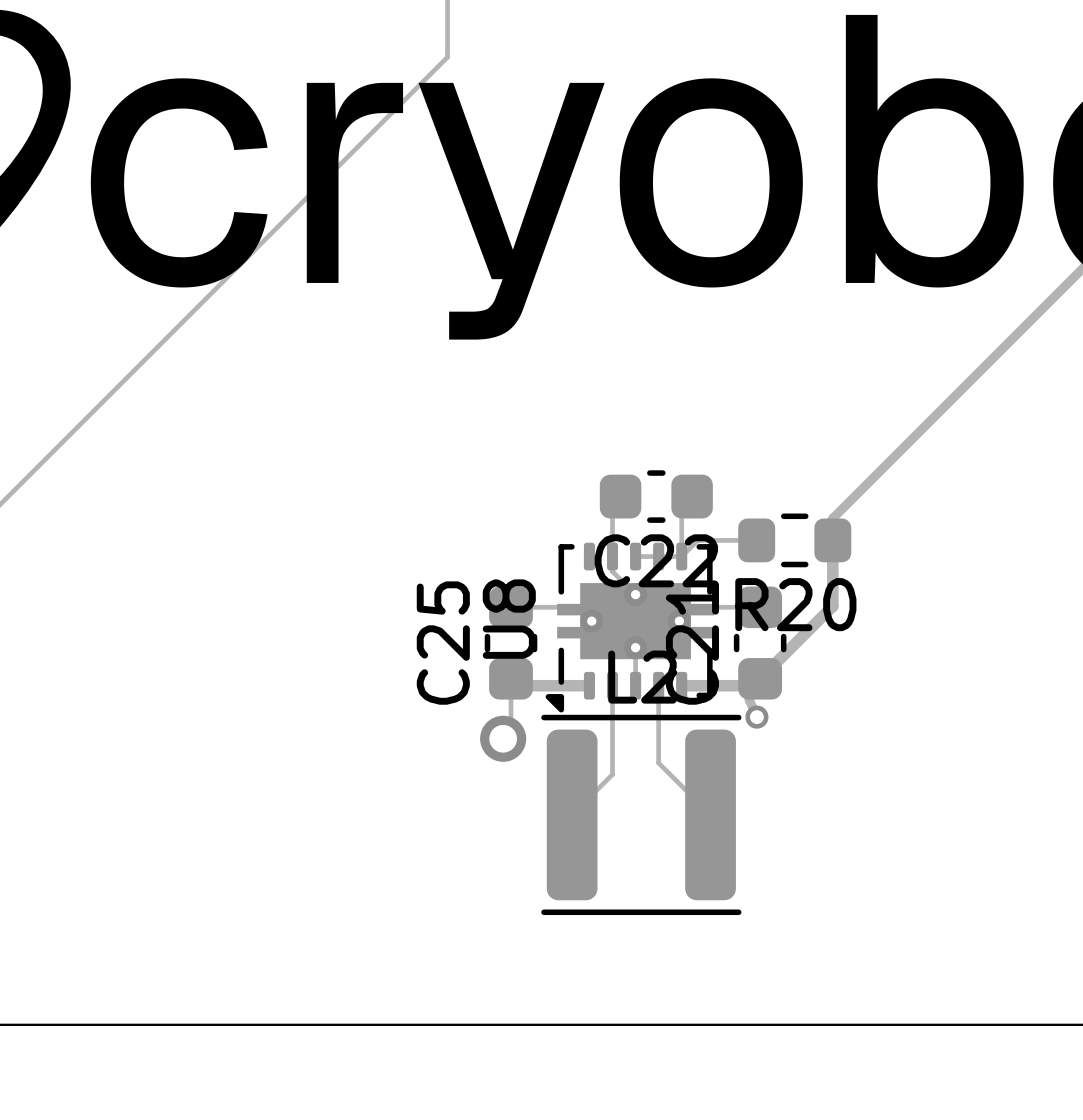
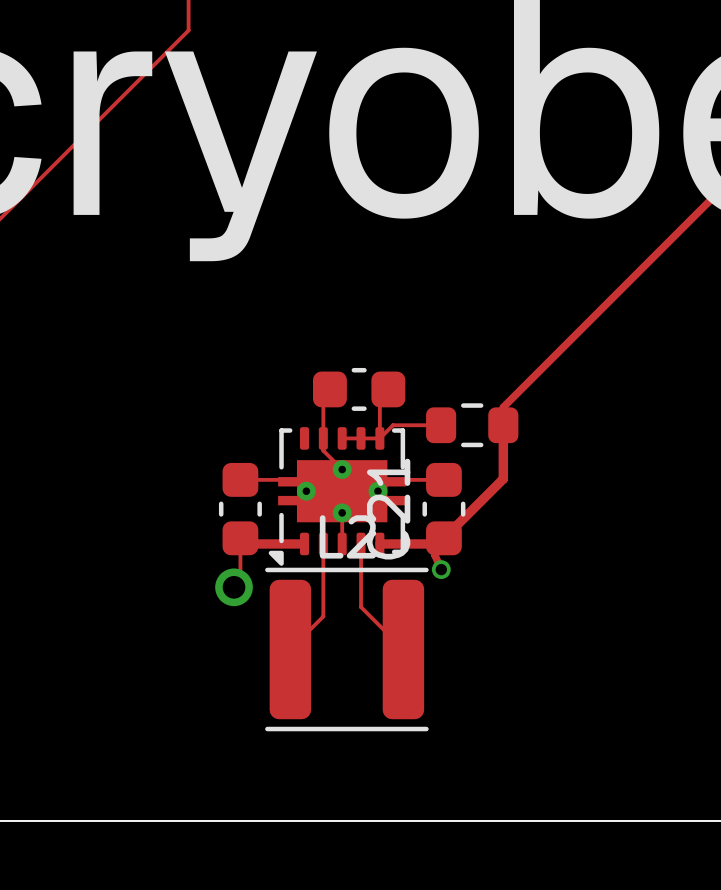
C22 name: C22 (656, 560) -> none
R20 name: R20 (795, 604) -> none
U8 name: U8 (509, 619) -> none
C25 name: C25 (443, 643) -> none

